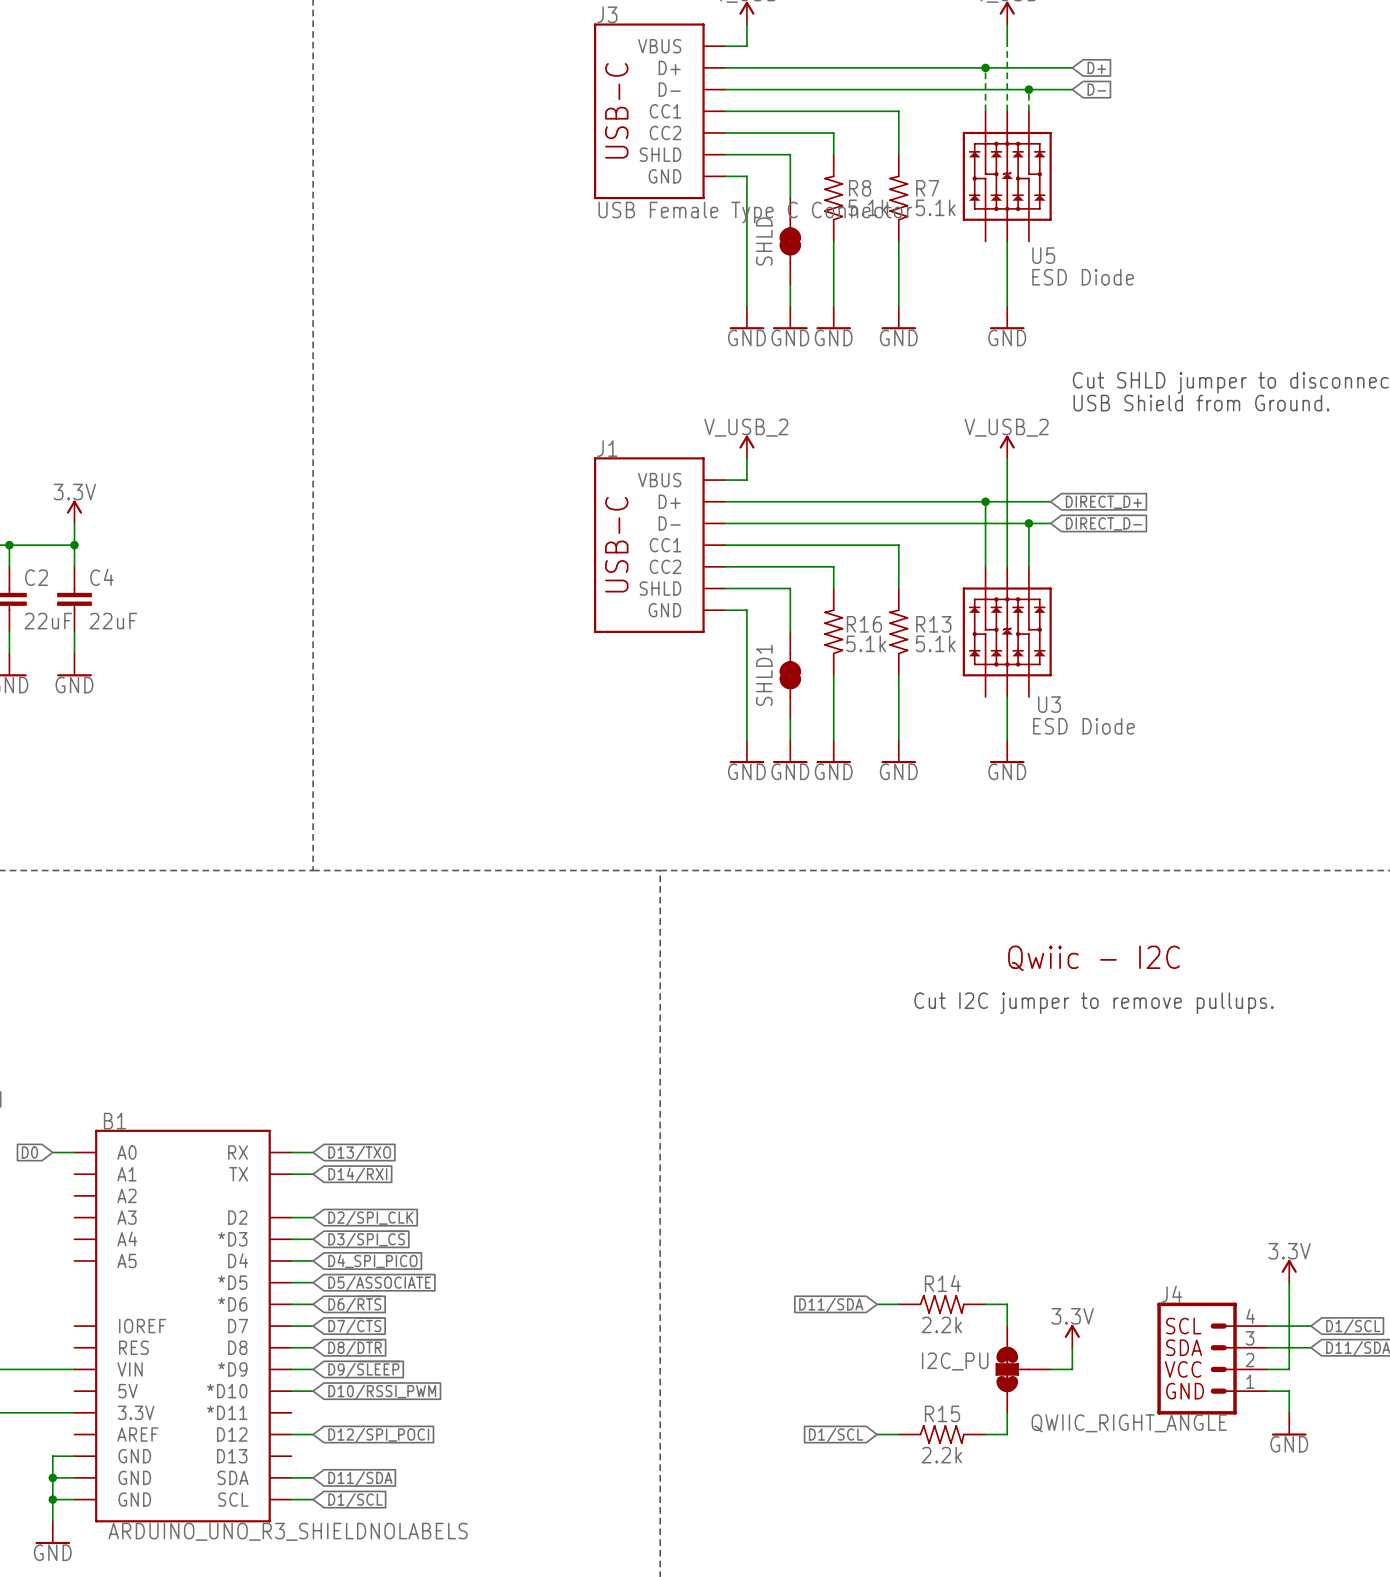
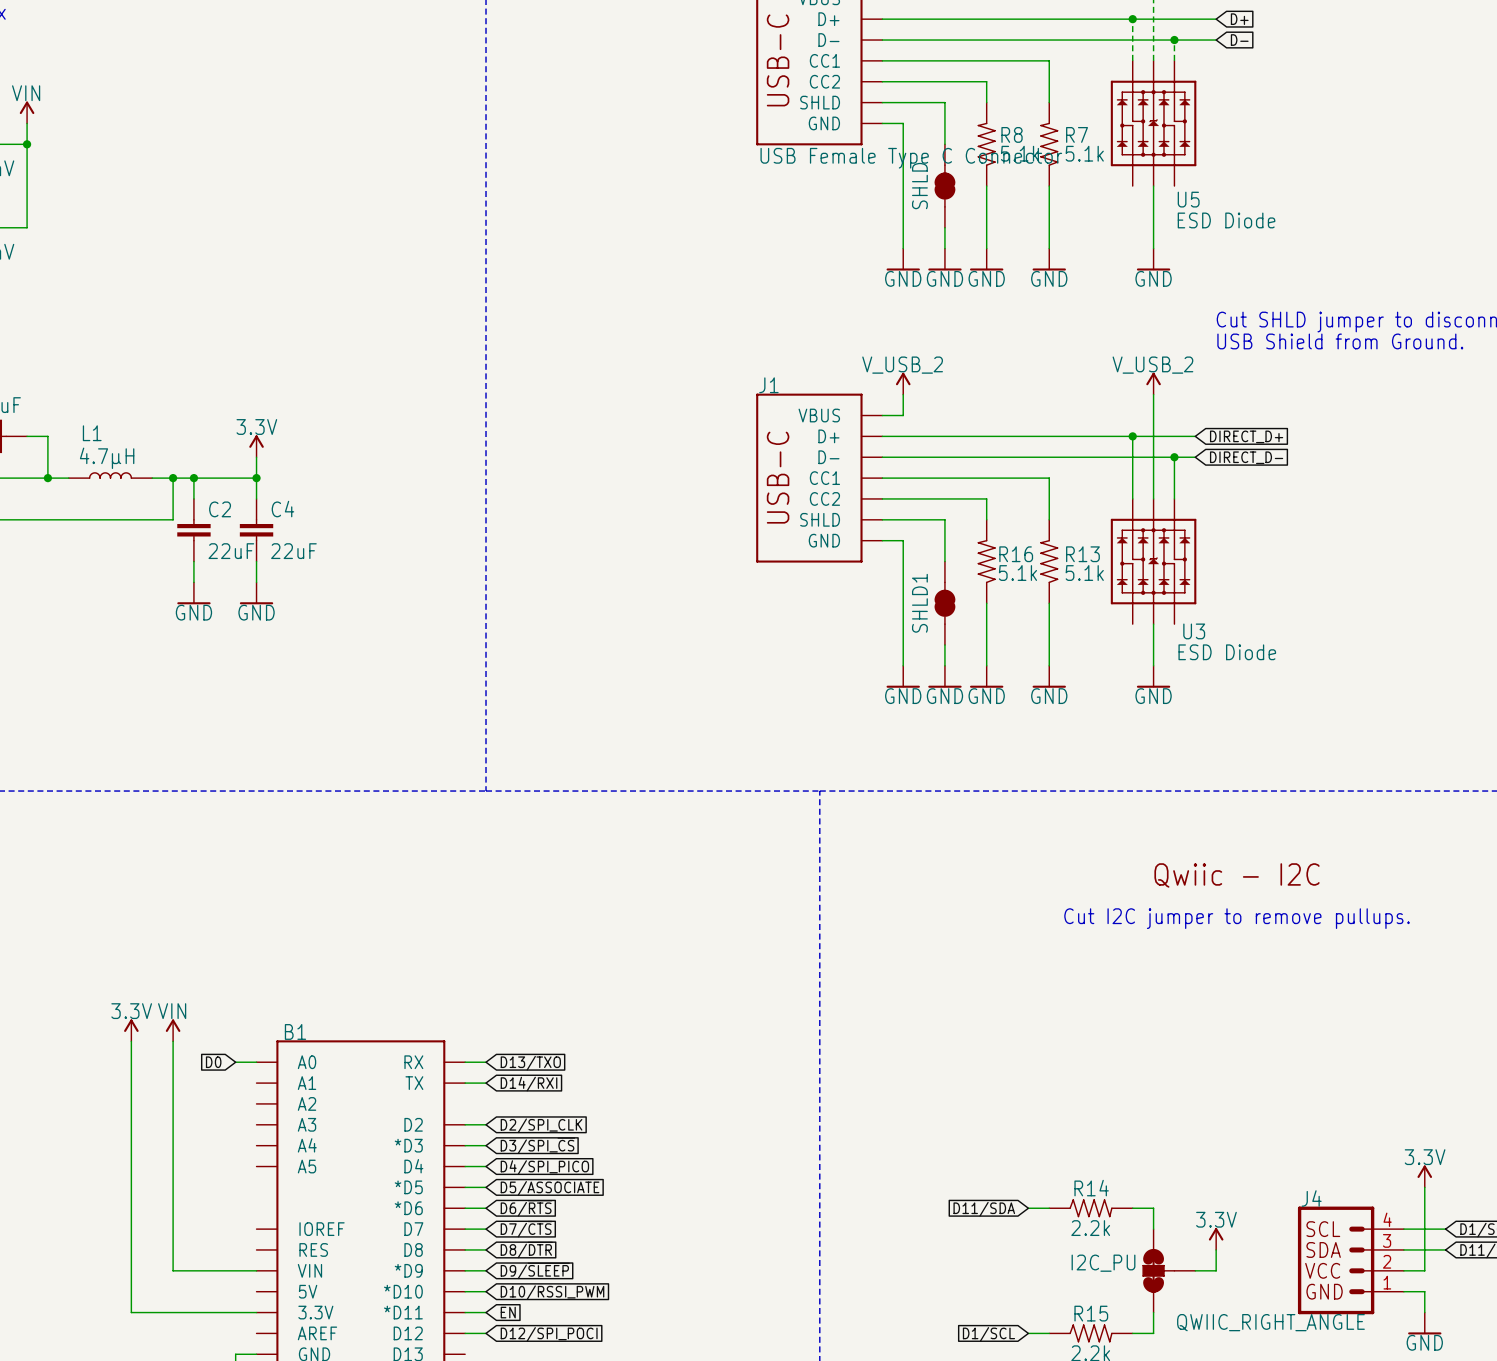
global label: D4_SPI_PICO (372, 1261) -> D4/SPI_PICO (544, 1167)
wire: none -> (465, 1312) (486, 1312)
global label: none -> EN (508, 1312)

